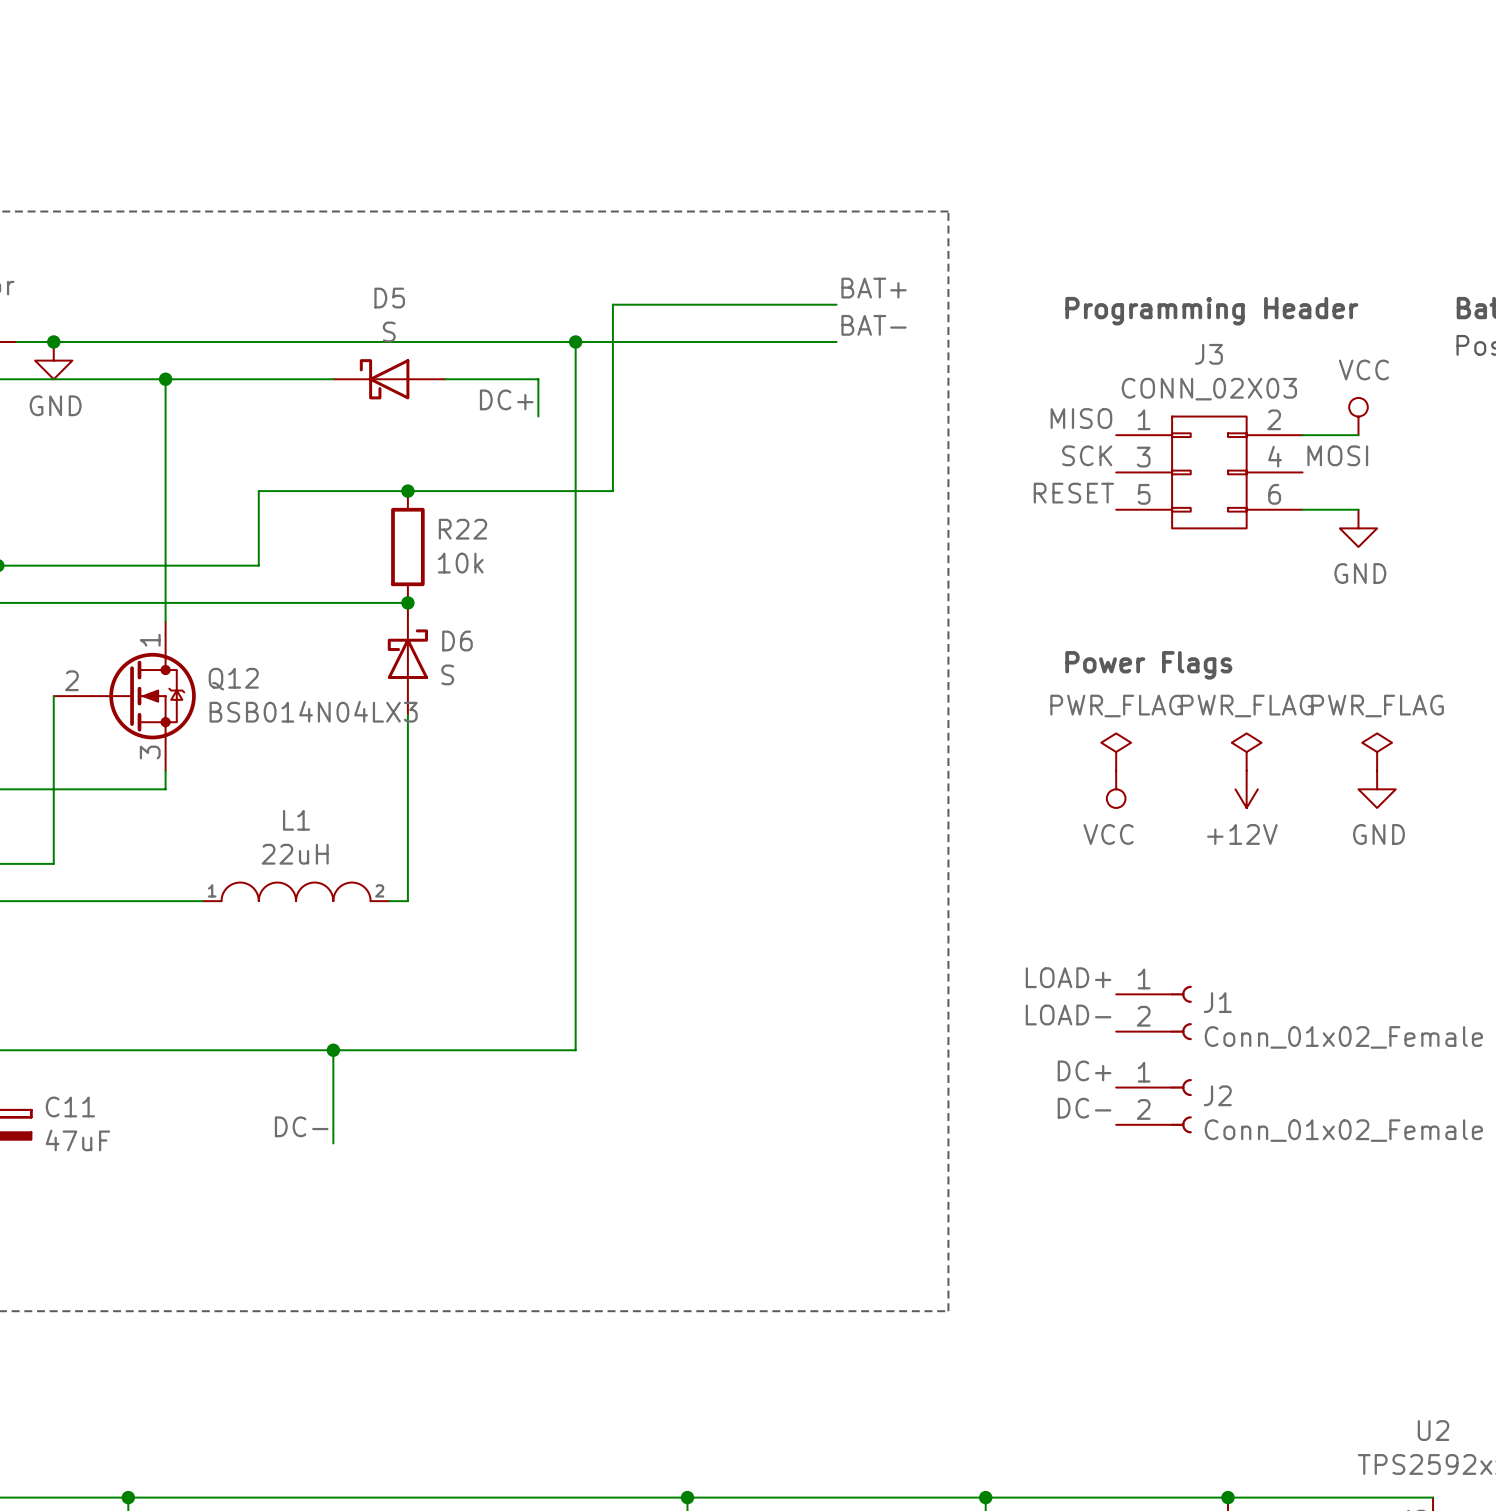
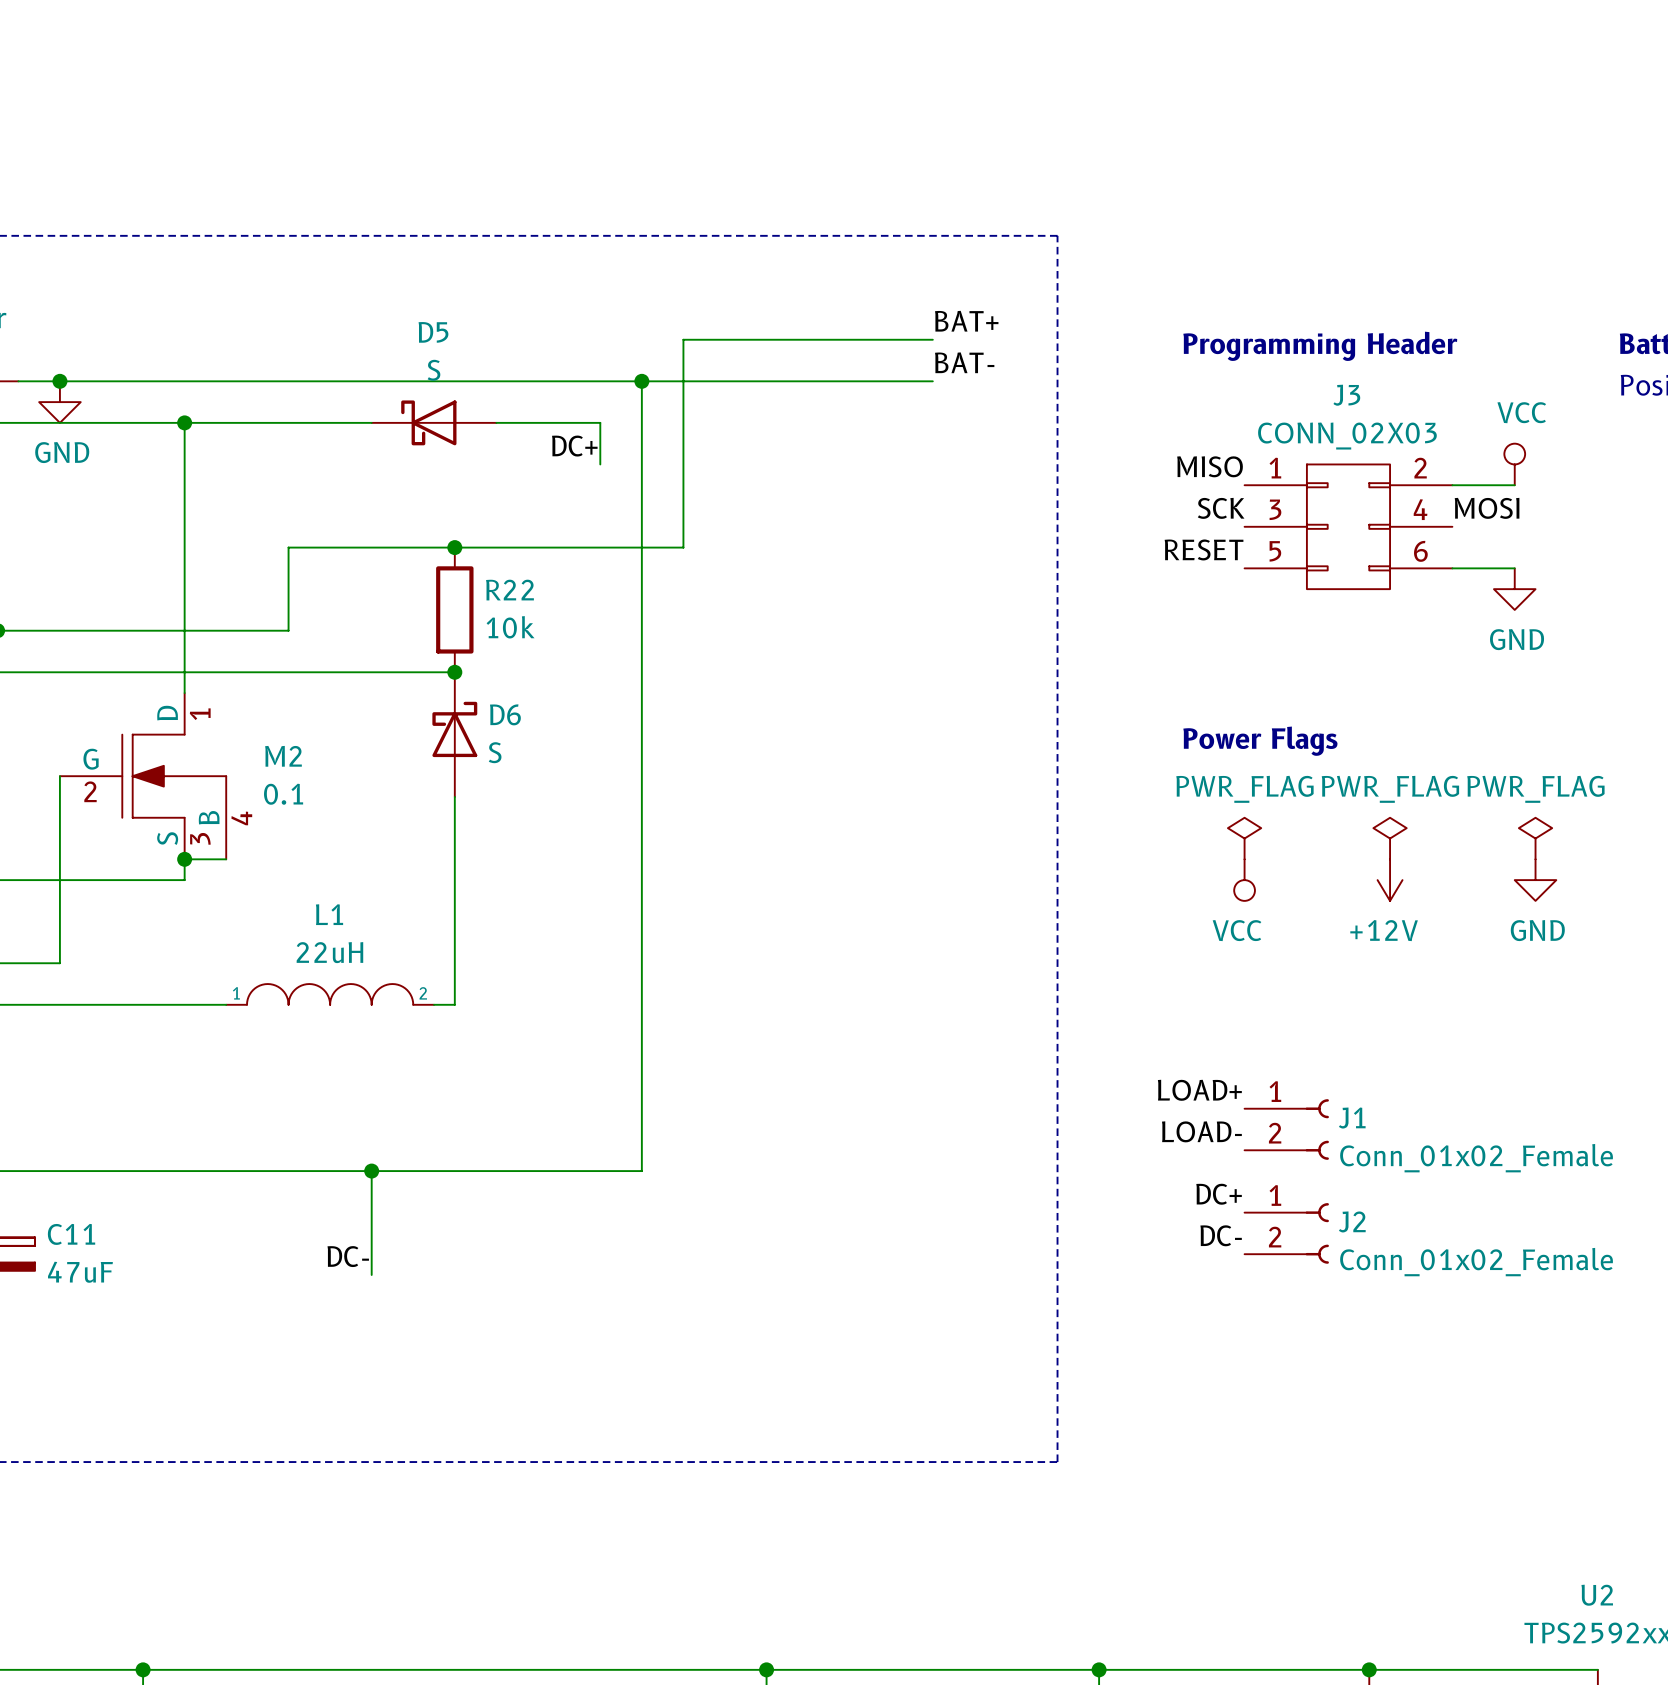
Q12: BSB014N04LX3 (124, 696) -> none
M2: none -> 0.1 (143, 776)
wire: none -> (184, 859) (226, 859)
junction: none -> (184, 859)

